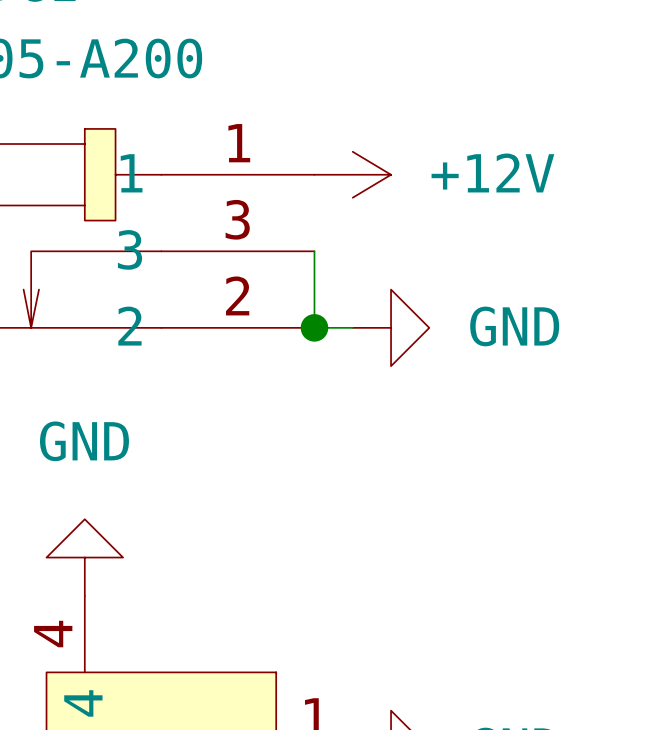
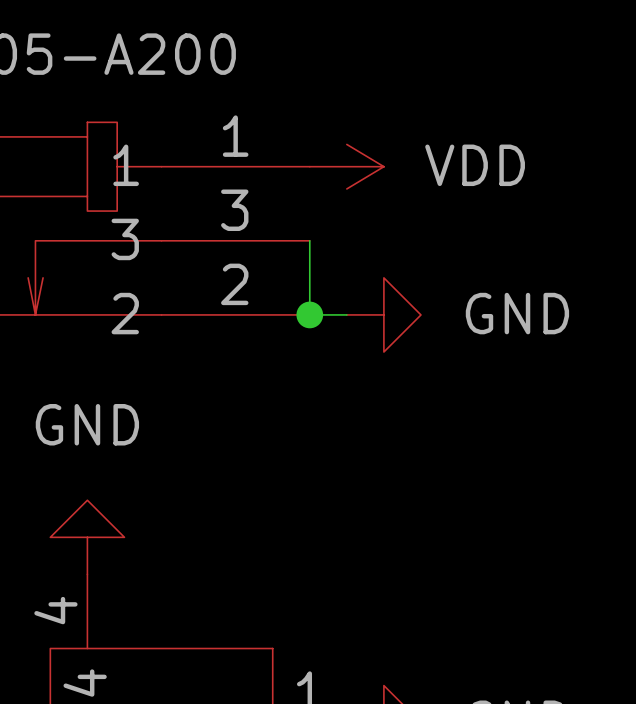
power symbol: +12V (352, 174) -> VDD (346, 166)

